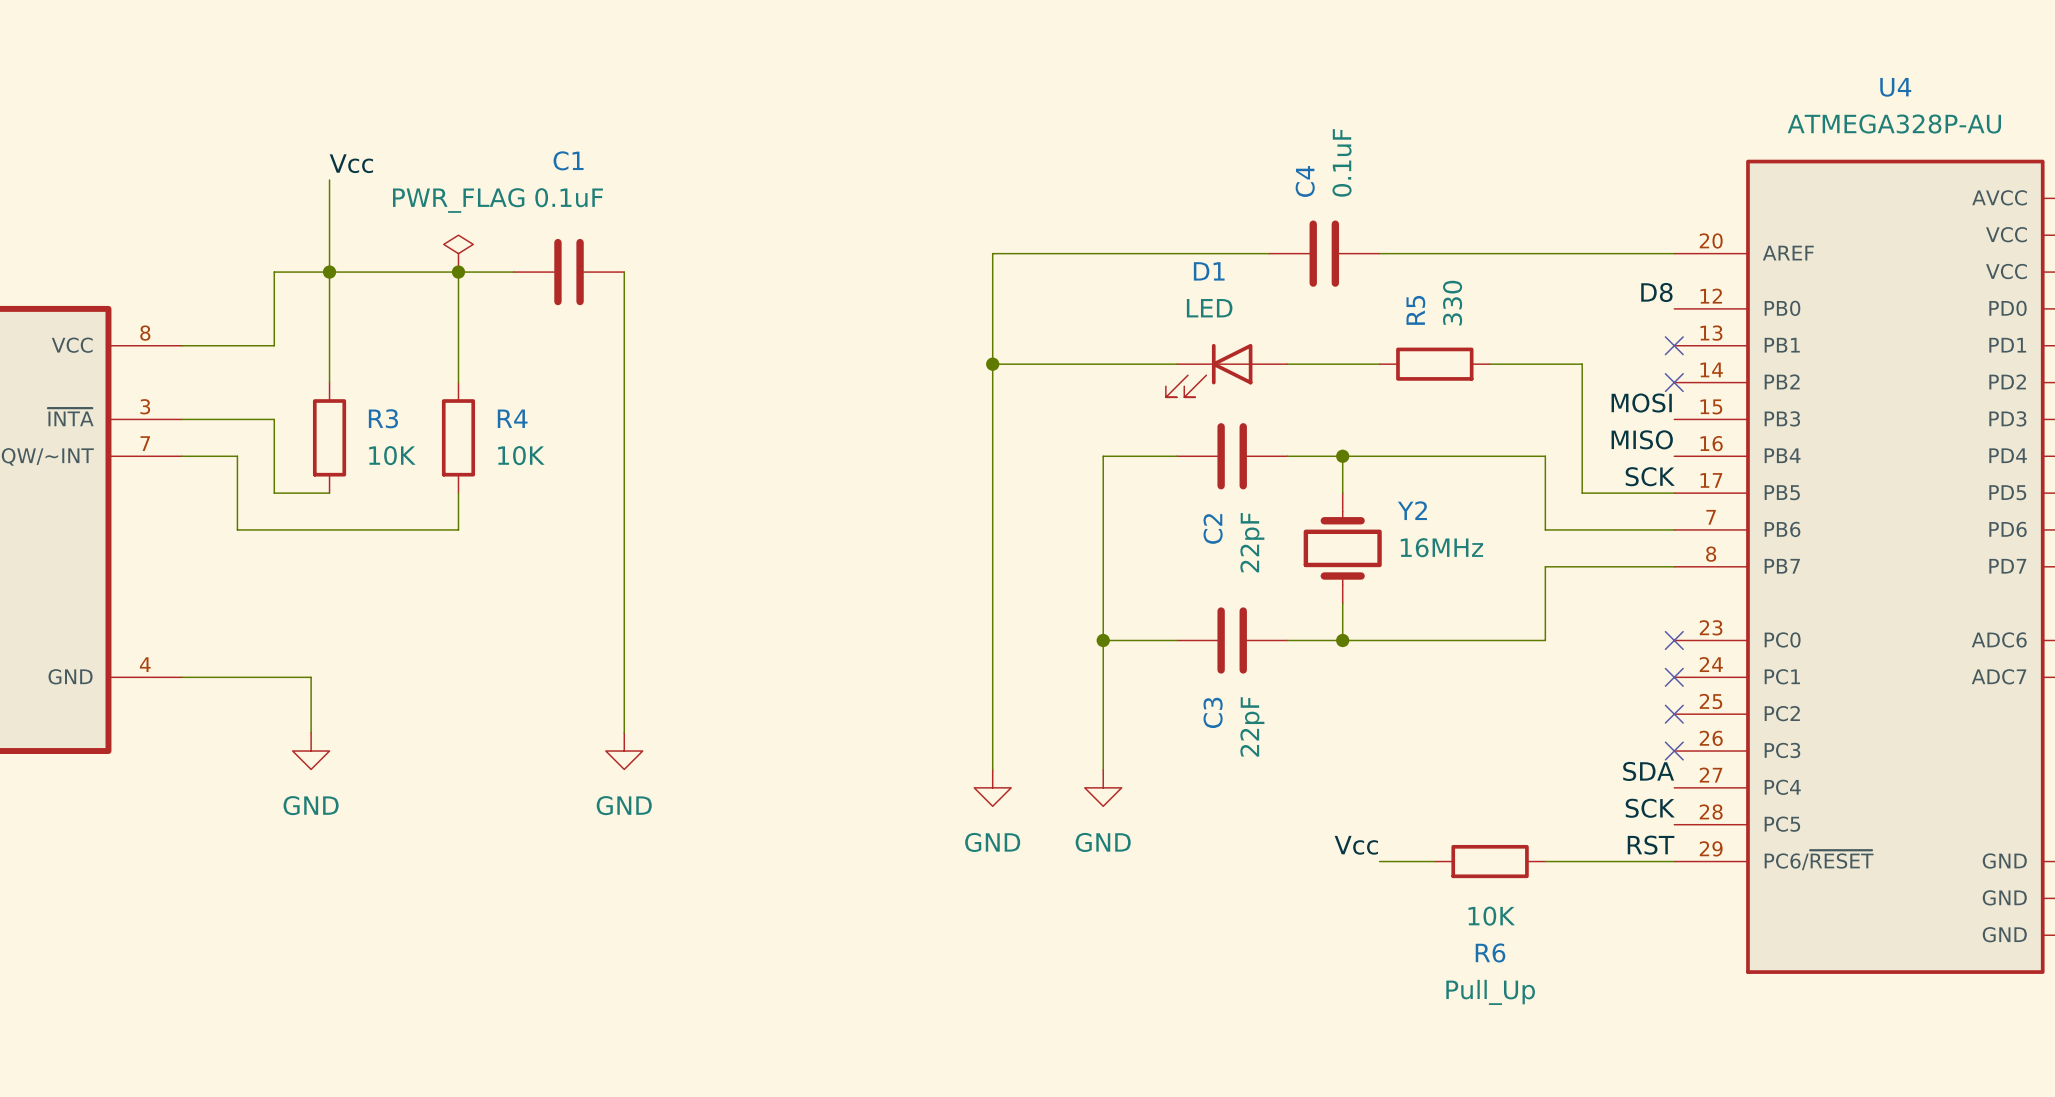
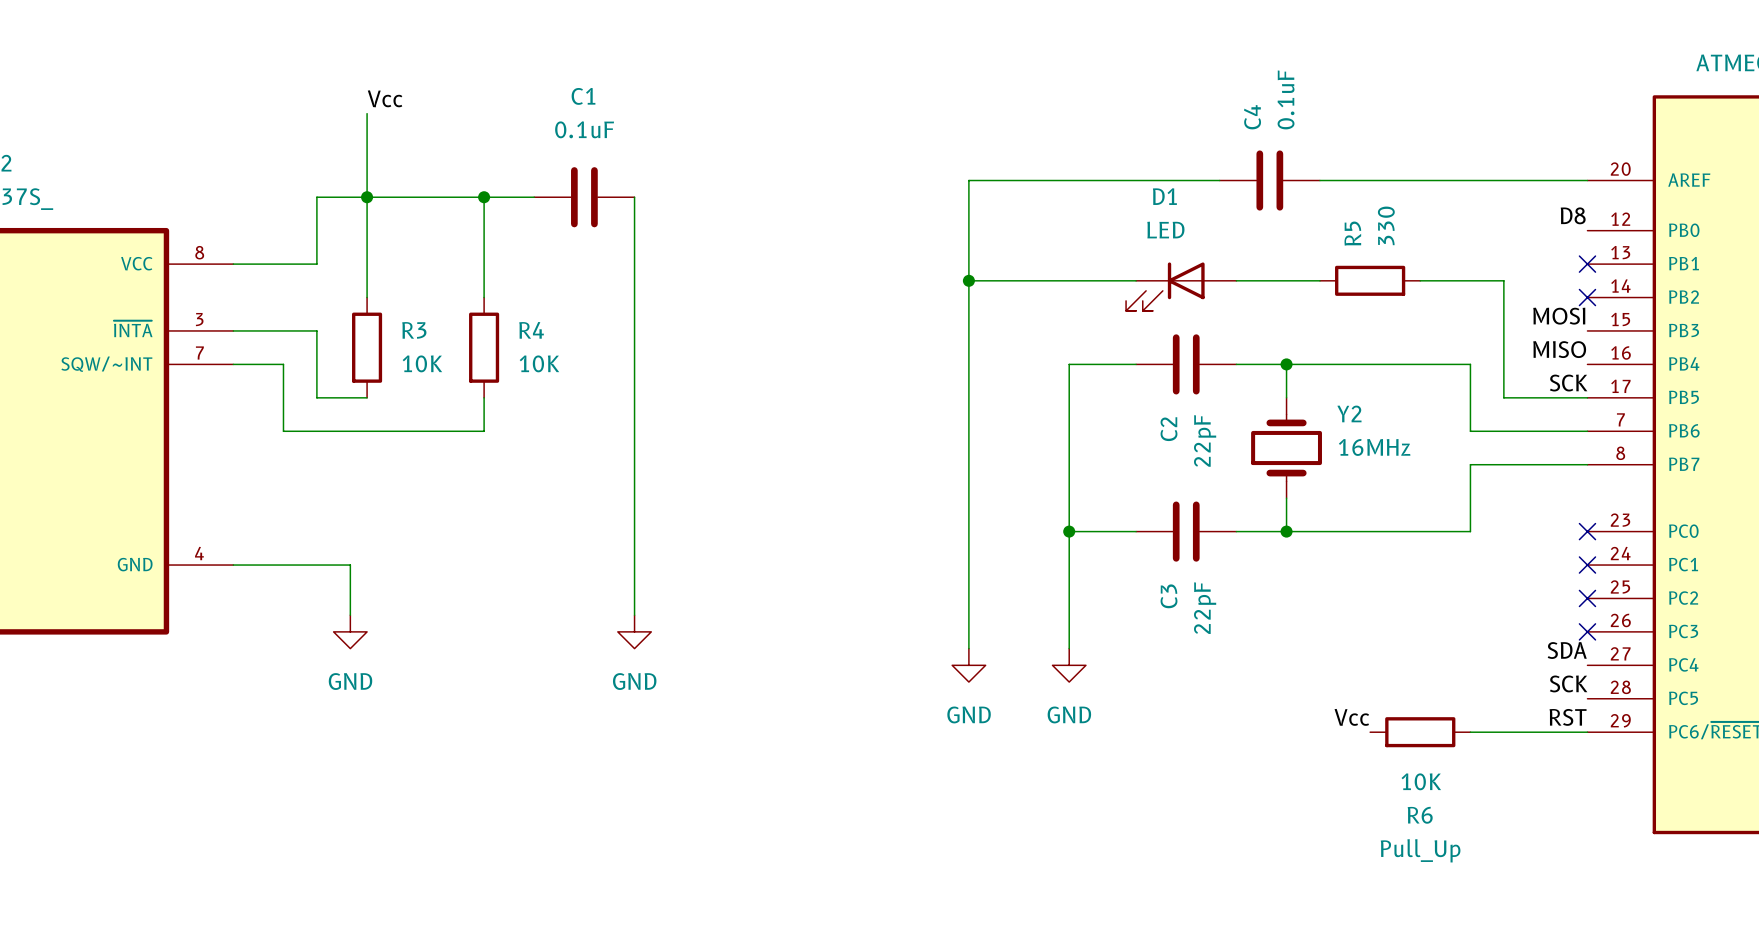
power symbol: PWR_FLAG (458, 253) -> none
label position: Vcc (1356, 845) -> Vcc (1351, 717)
wire: (1379, 861) (1434, 861) -> none

